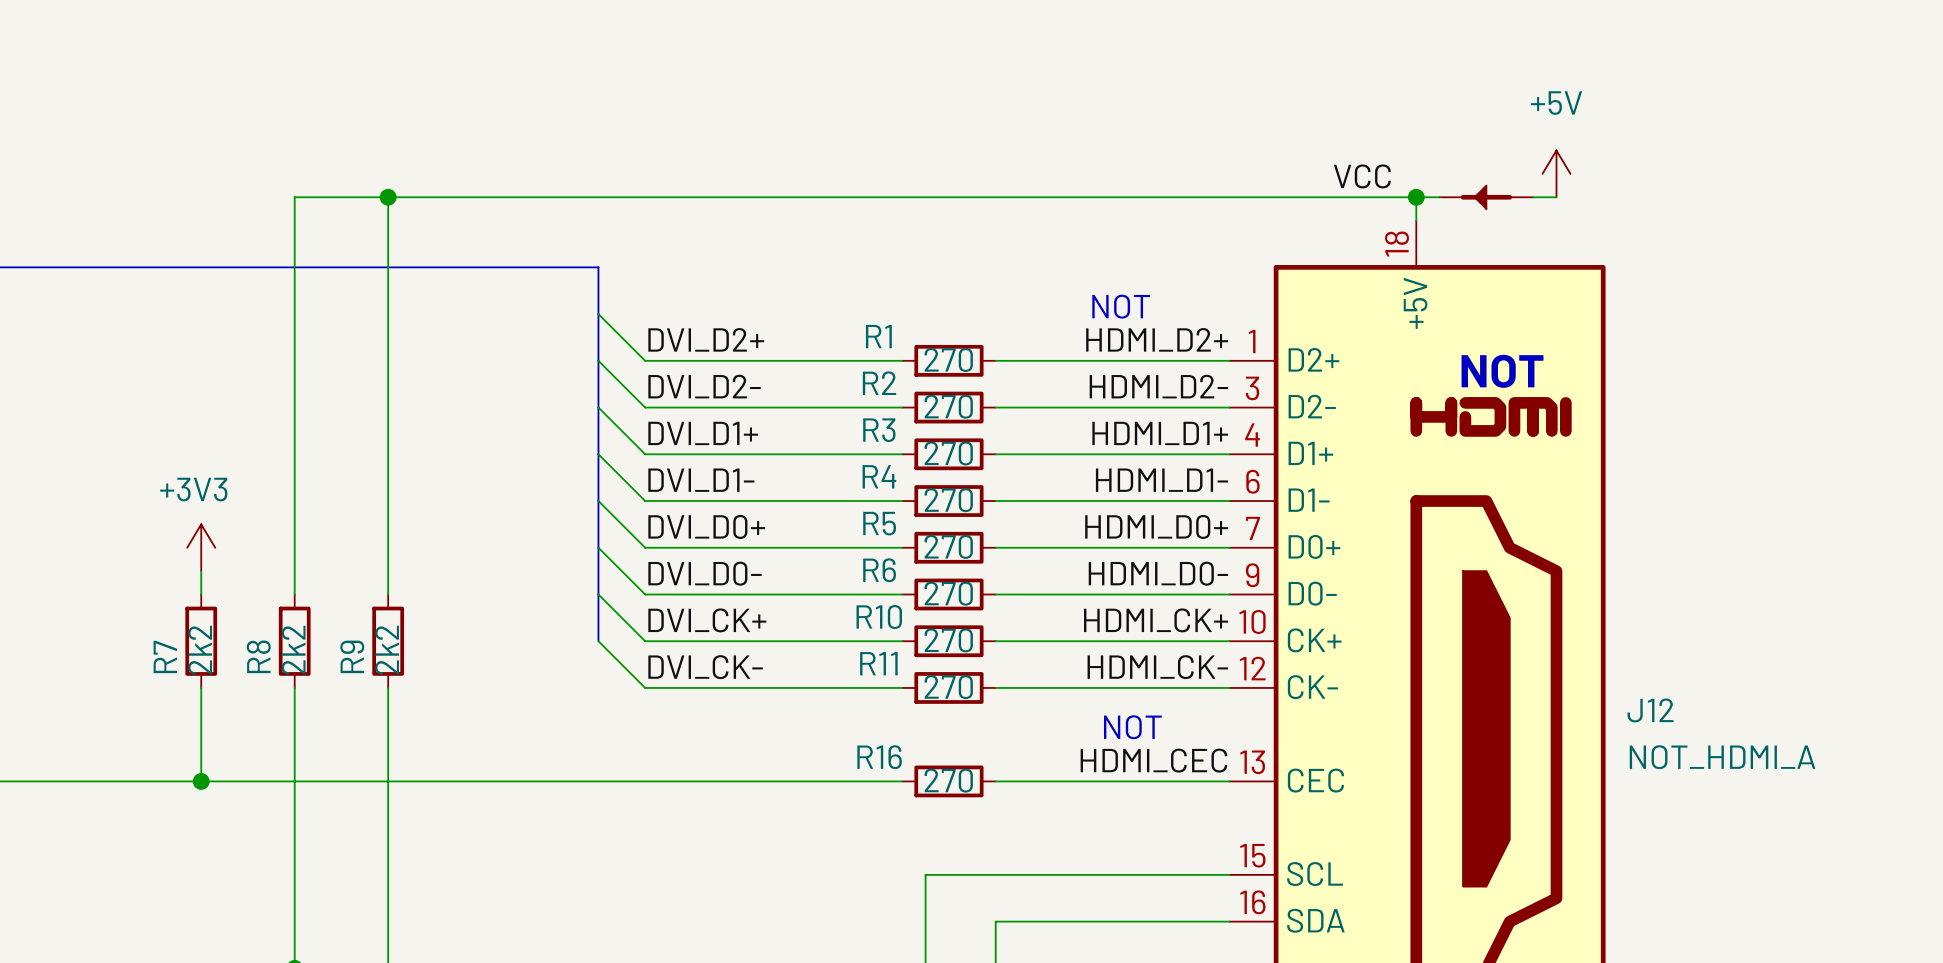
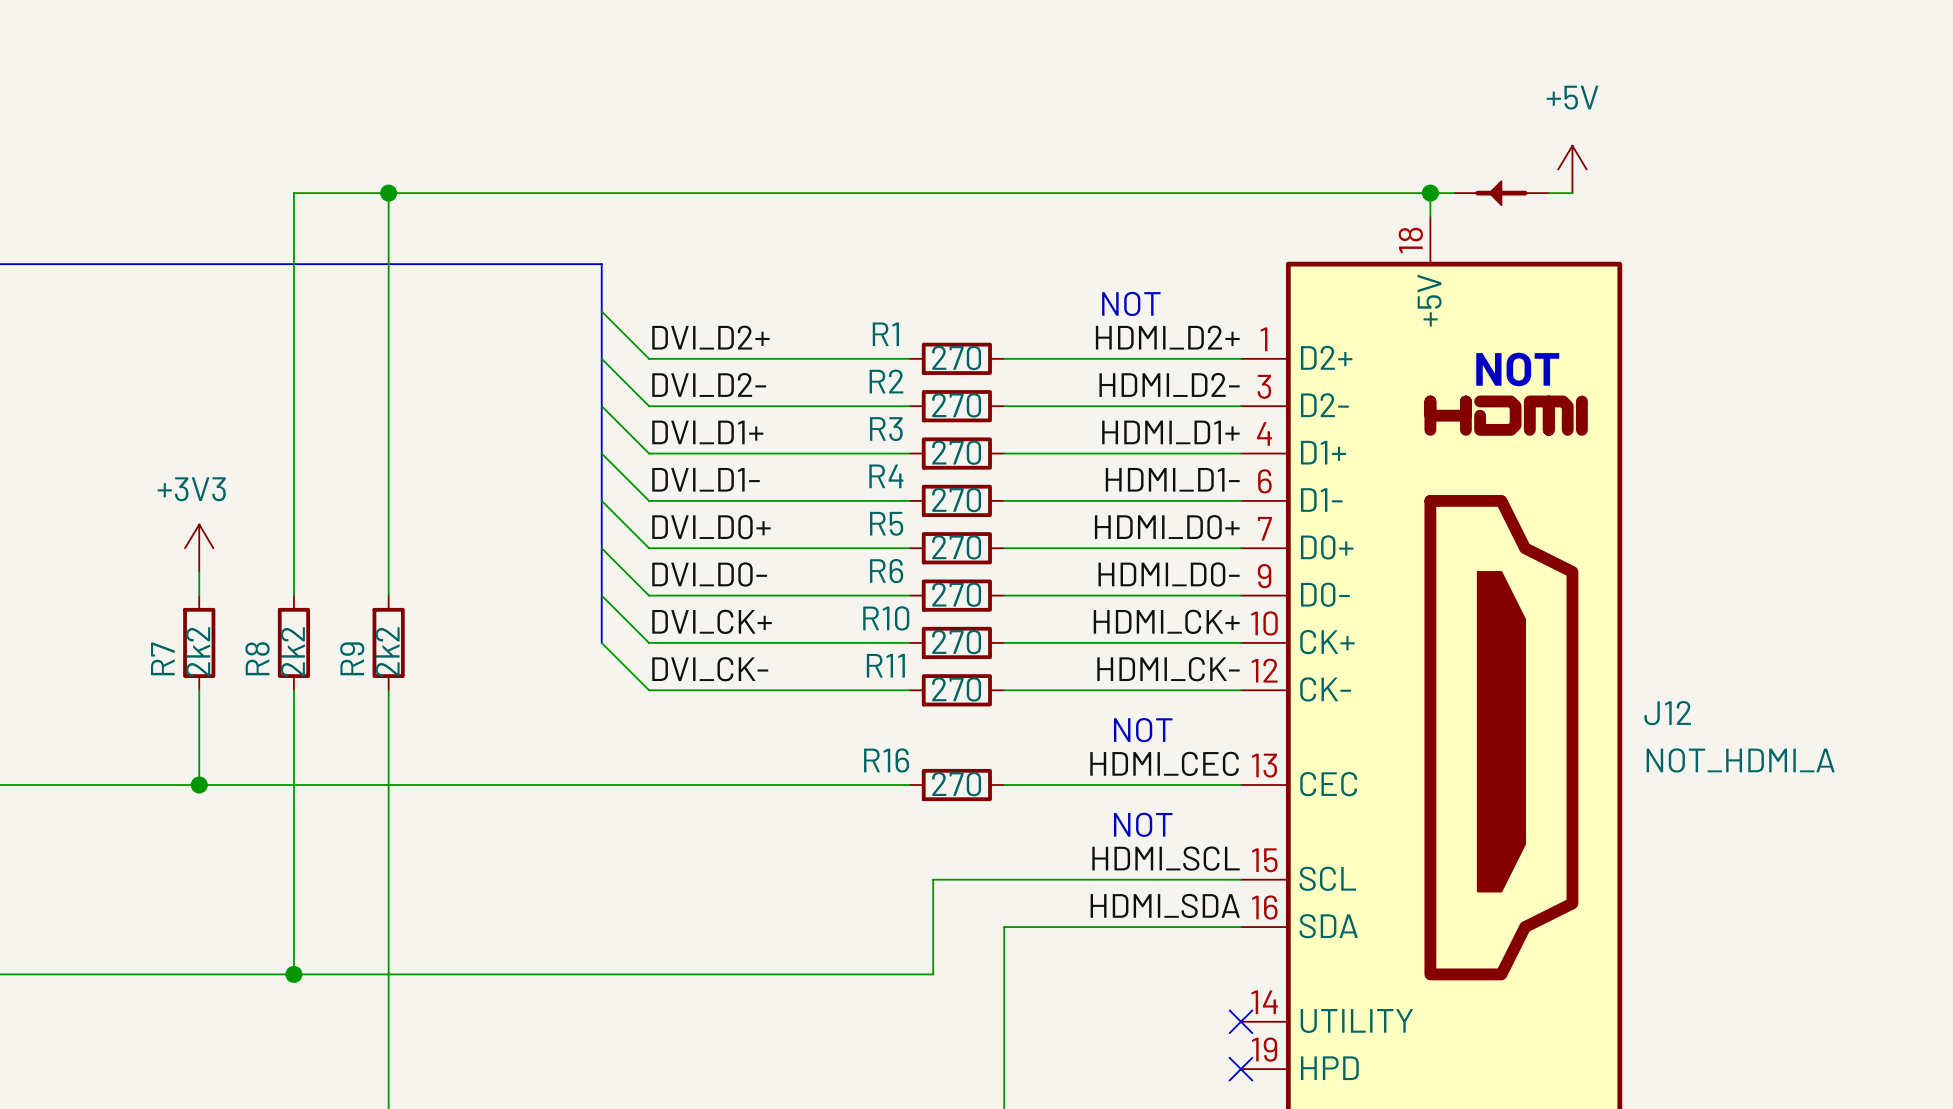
label: VCC (1362, 176) -> none
text: none -> NOT (1143, 824)
label: none -> HDMI_SCL (1166, 858)
label: none -> HDMI_SDA (1165, 905)

